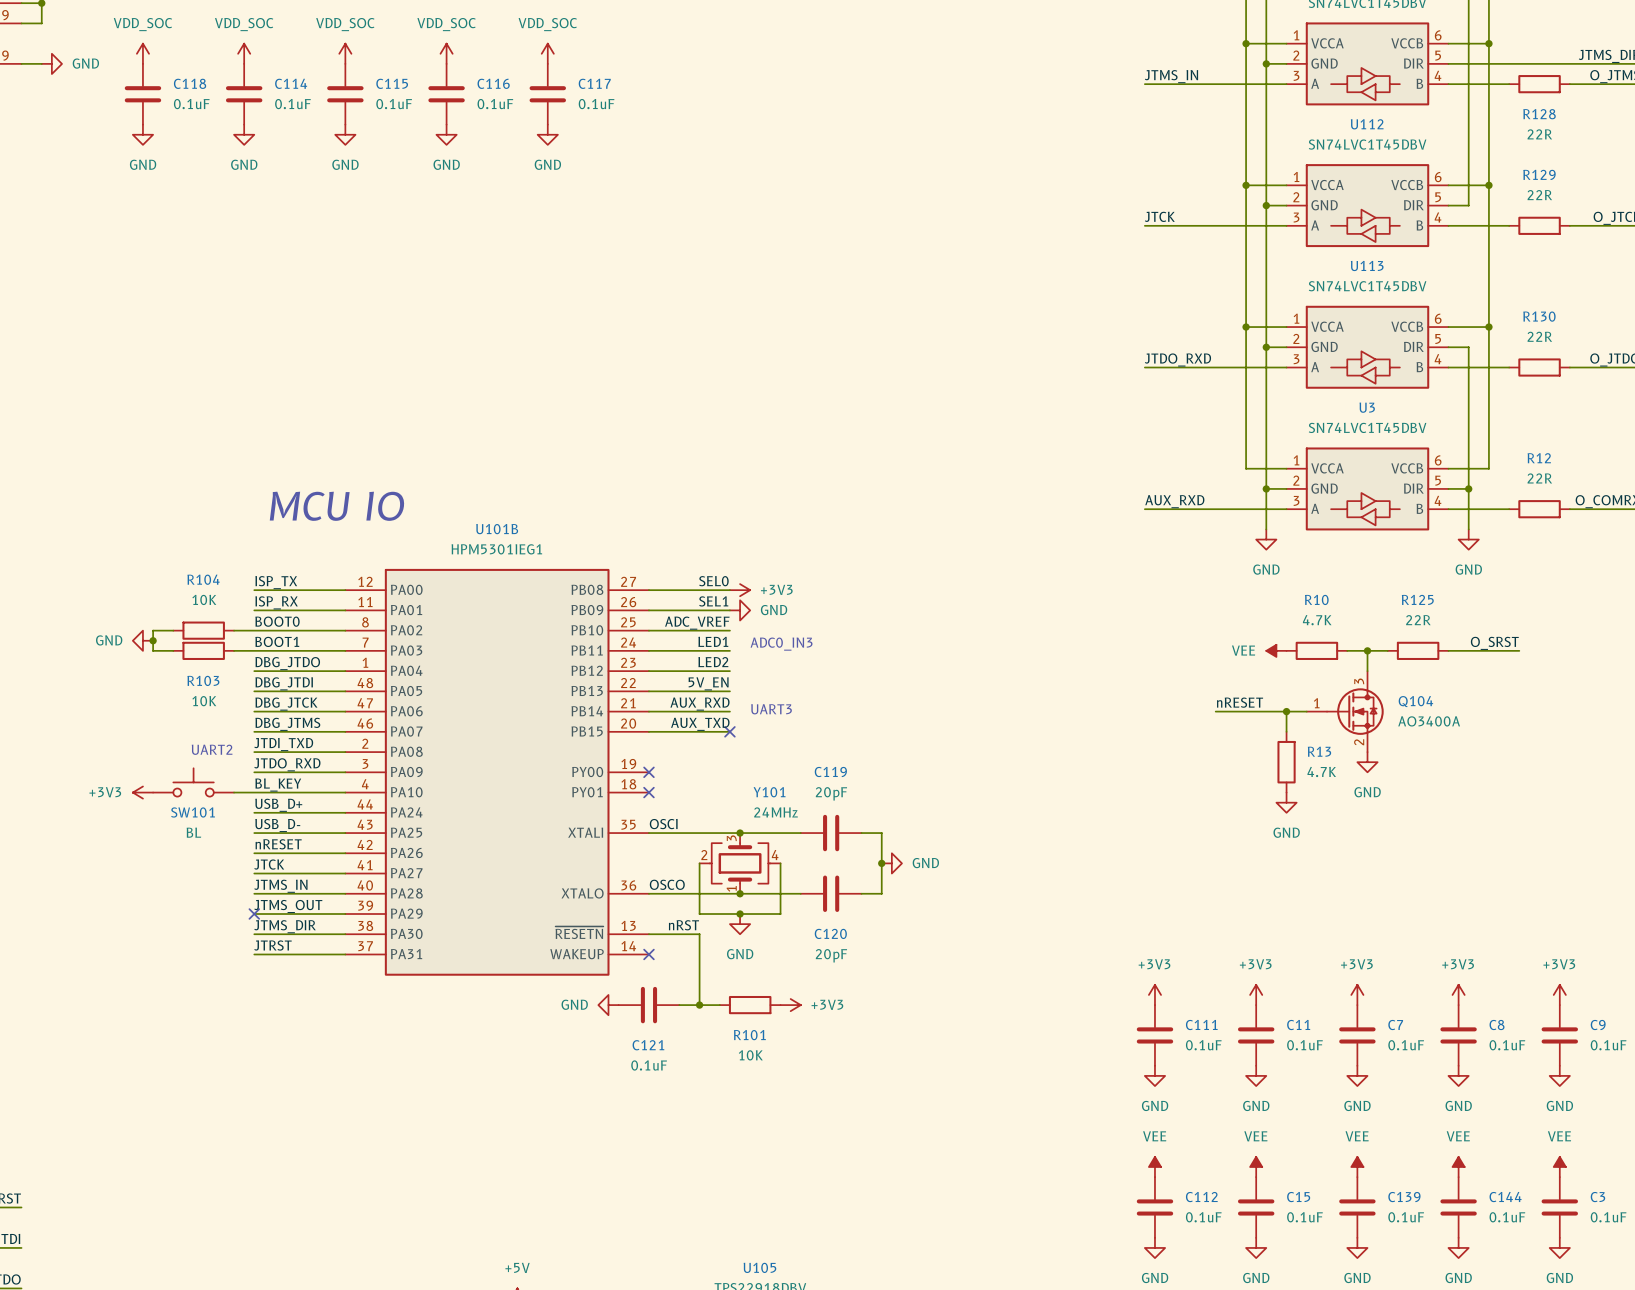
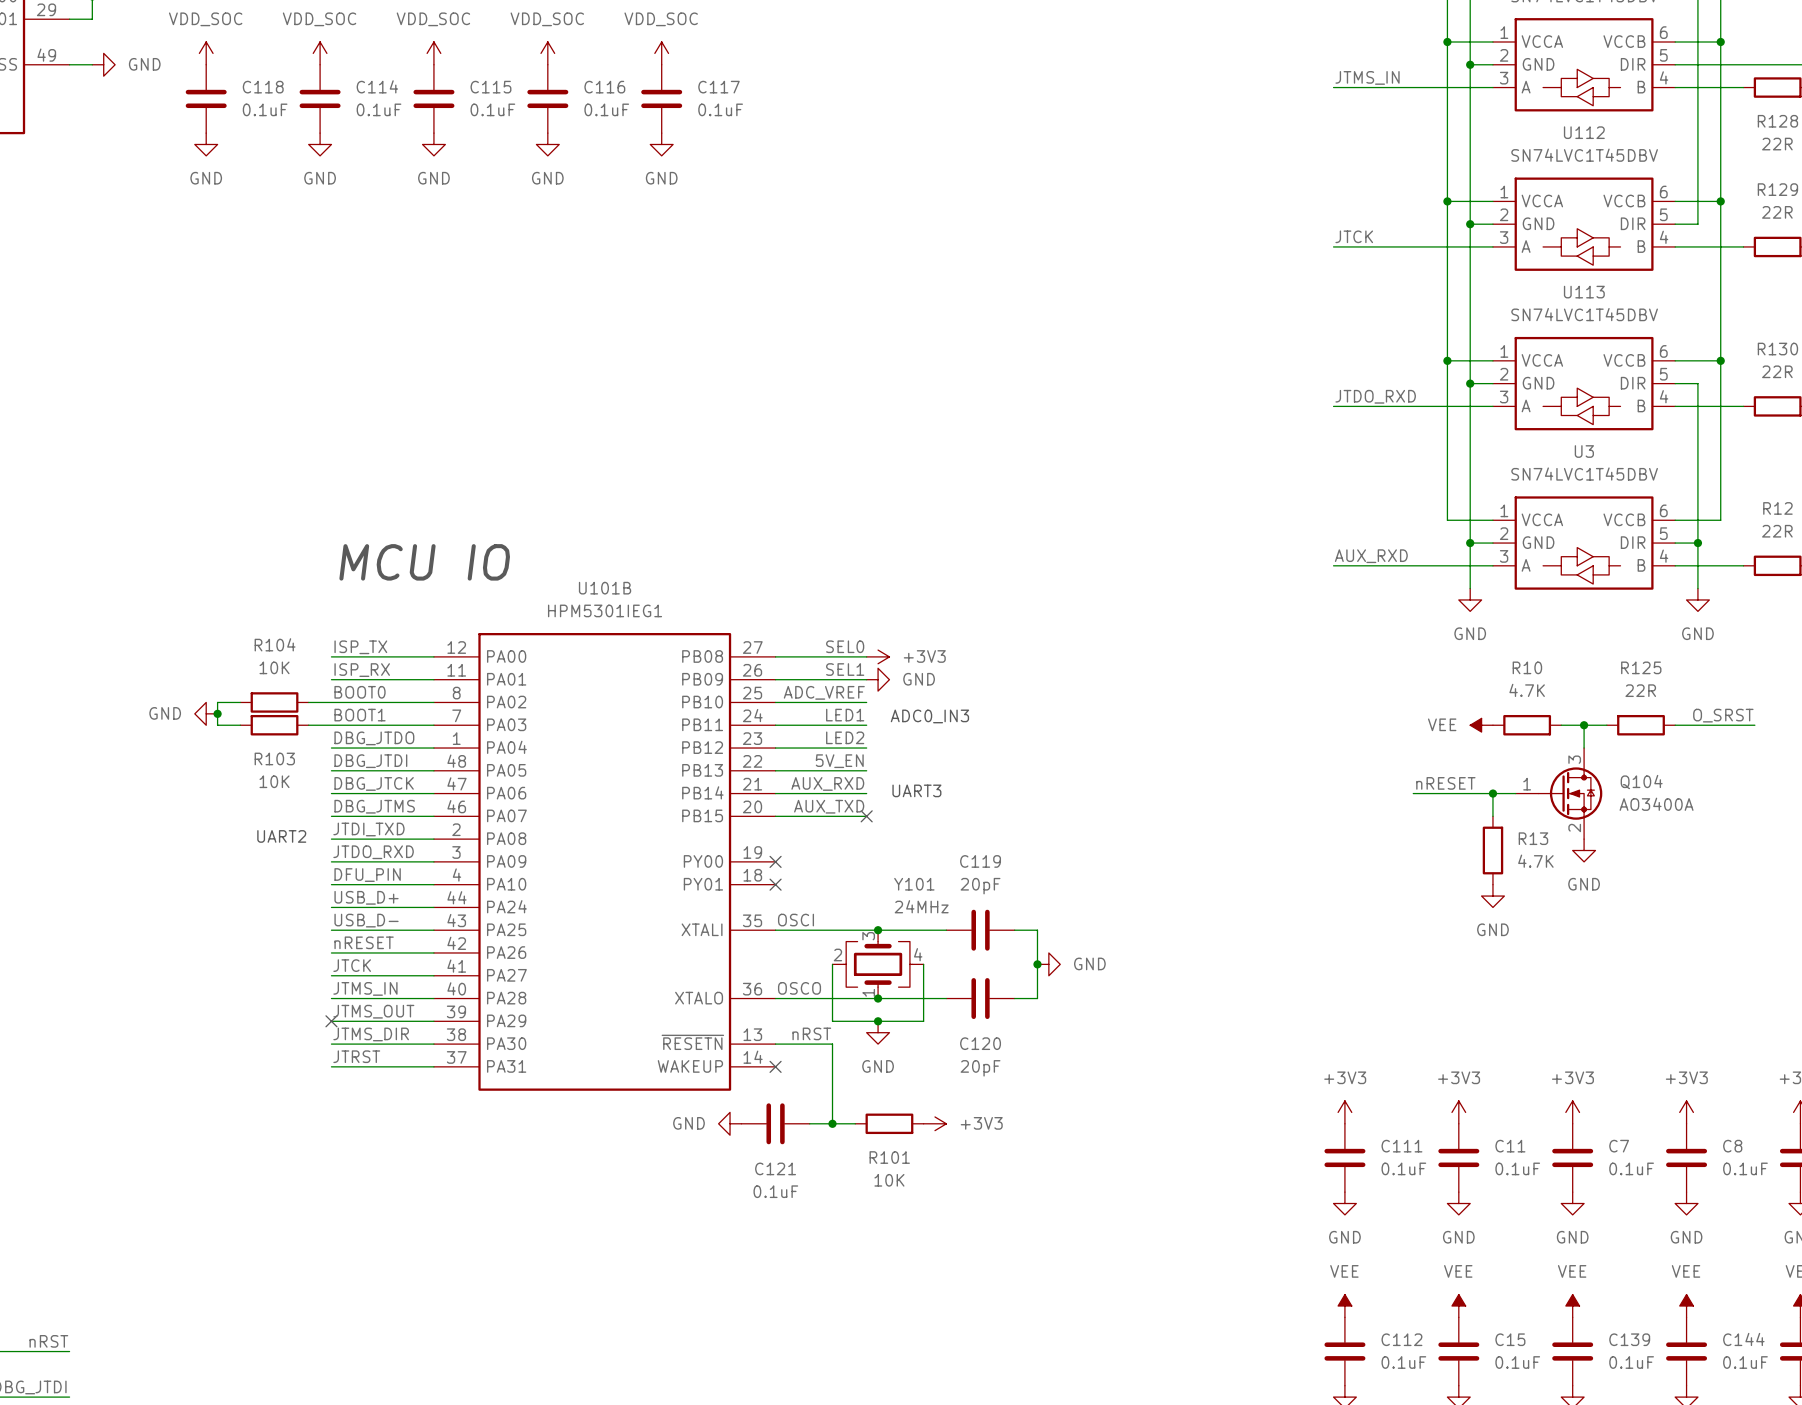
SW101: BL (193, 782) -> none
label: BL_KEY (278, 785) -> DFU_PIN (367, 875)
power symbol: +3V3 (142, 792) -> none
wire: (234, 792) (254, 792) -> none

